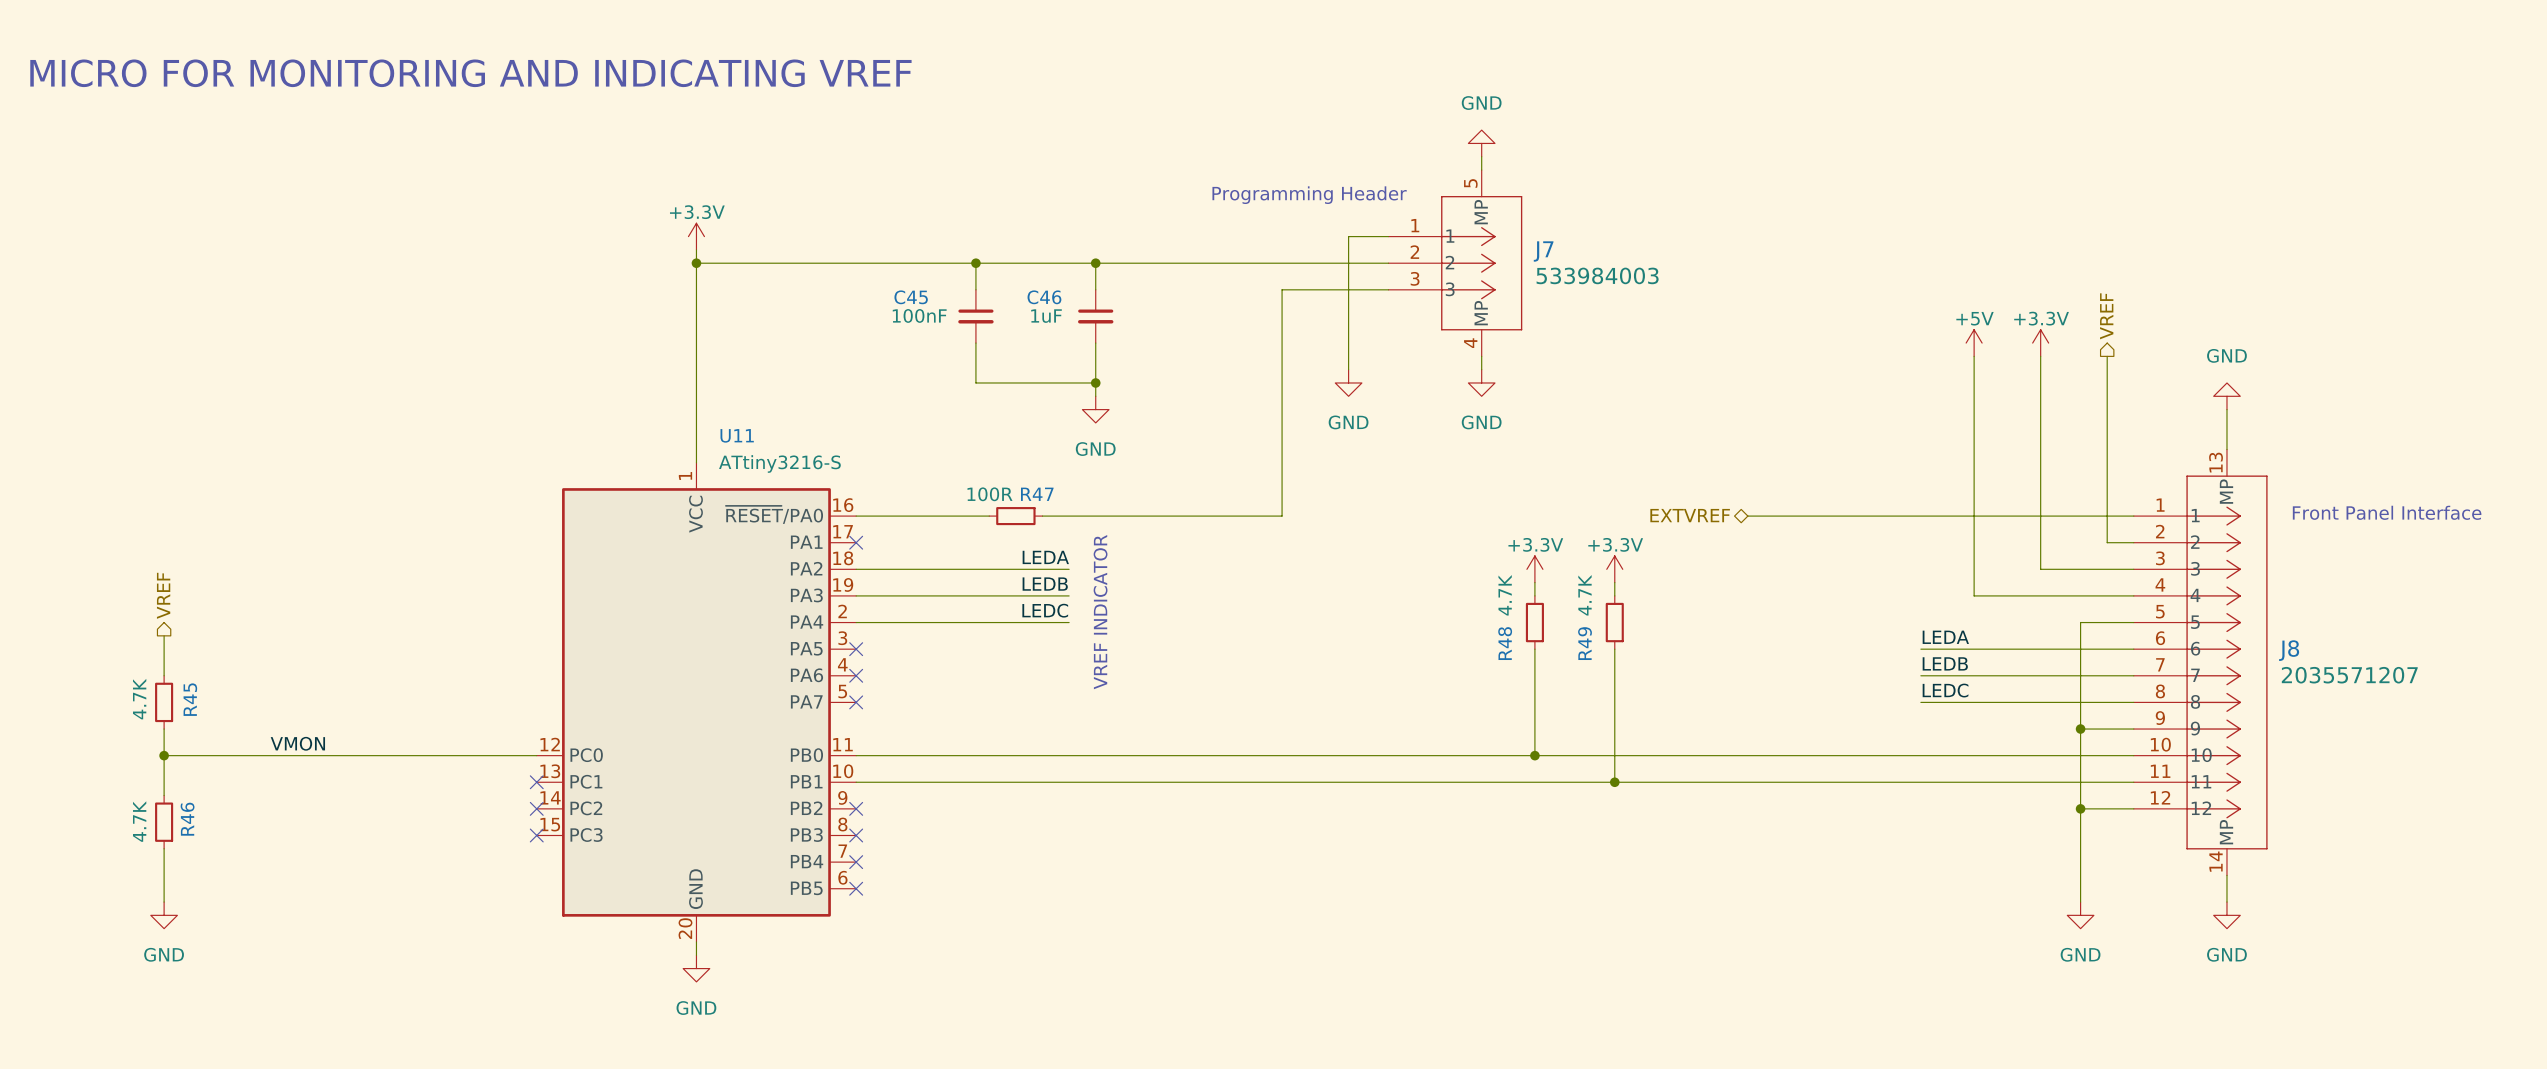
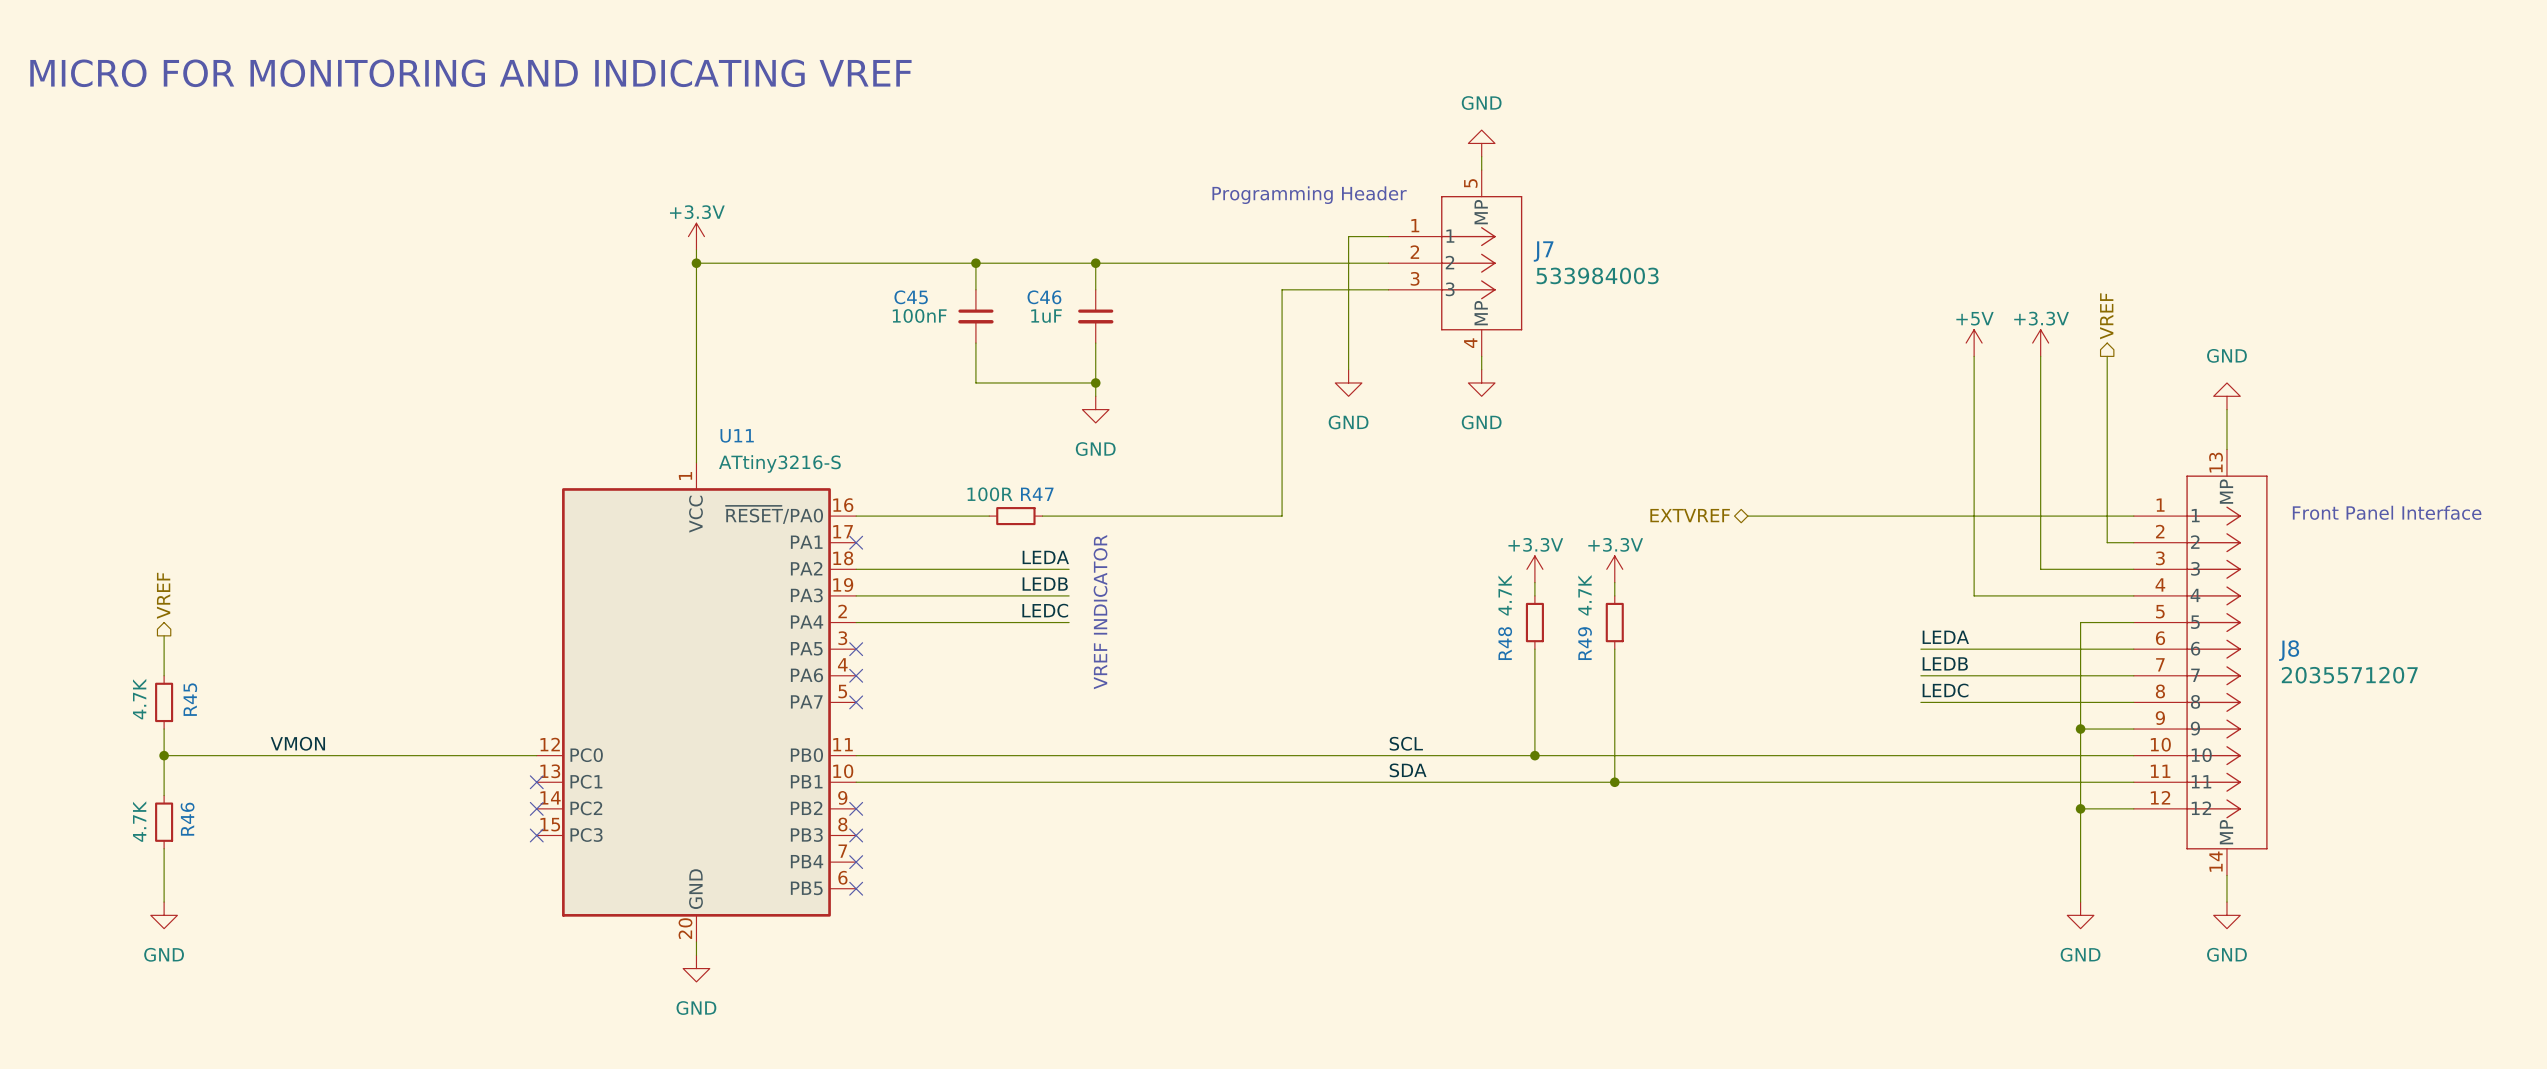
label: none -> SCL (1406, 743)
label: none -> SDA (1408, 770)

